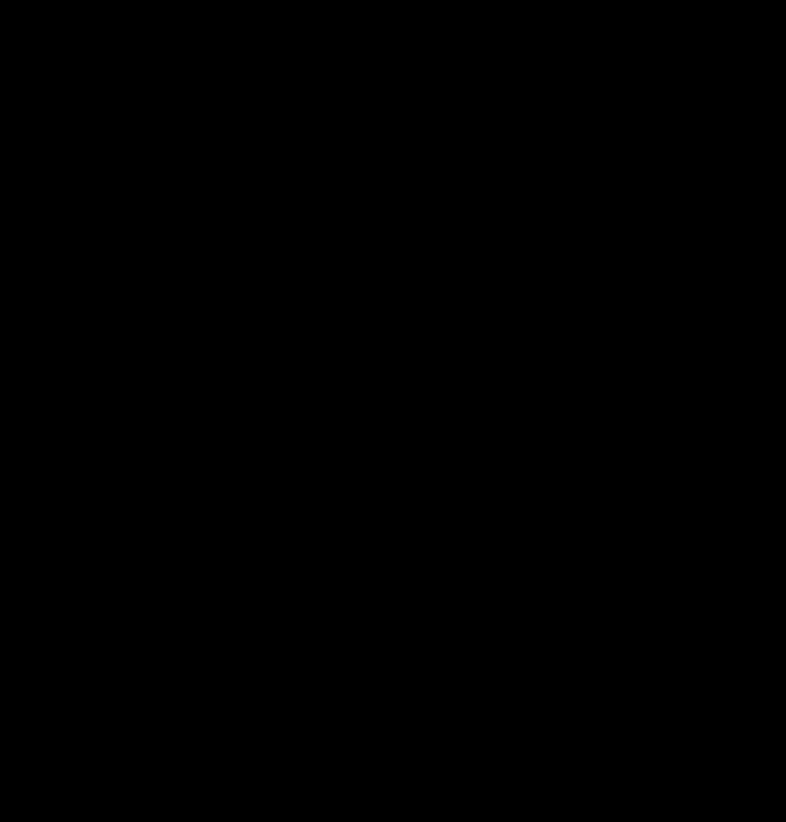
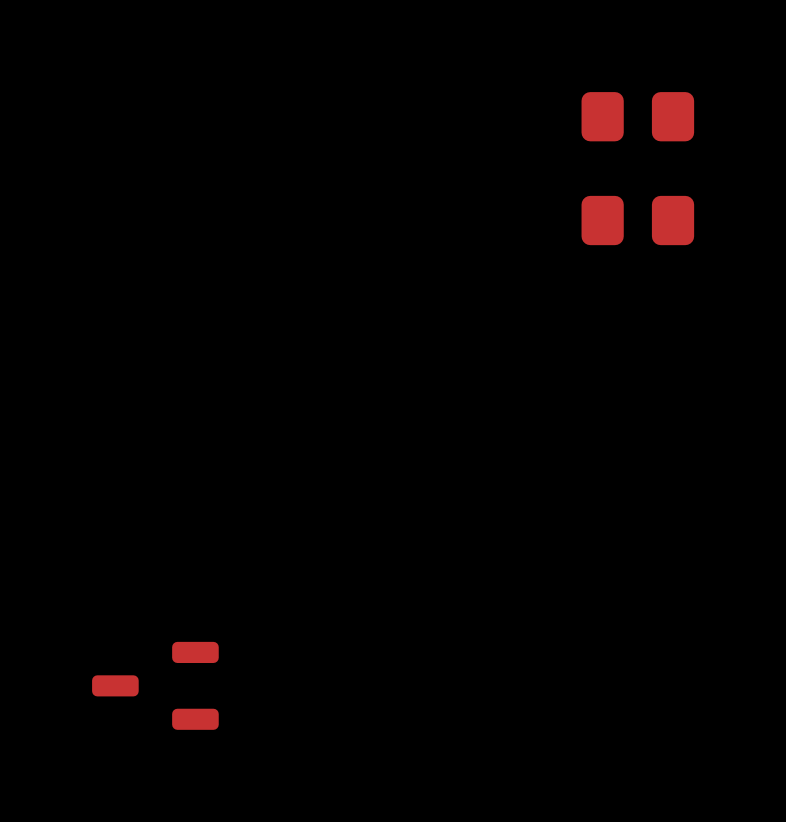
part: none -> (637, 116)
part: none -> (637, 220)
part: none -> (155, 685)

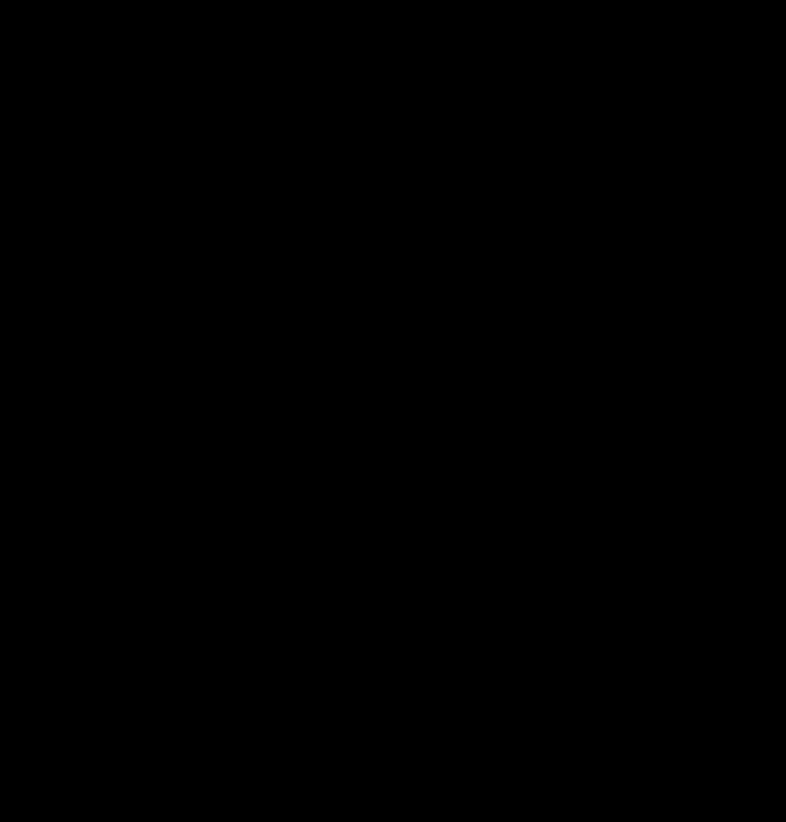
part: (637, 116) -> none
part: (637, 220) -> none
part: (155, 685) -> none

